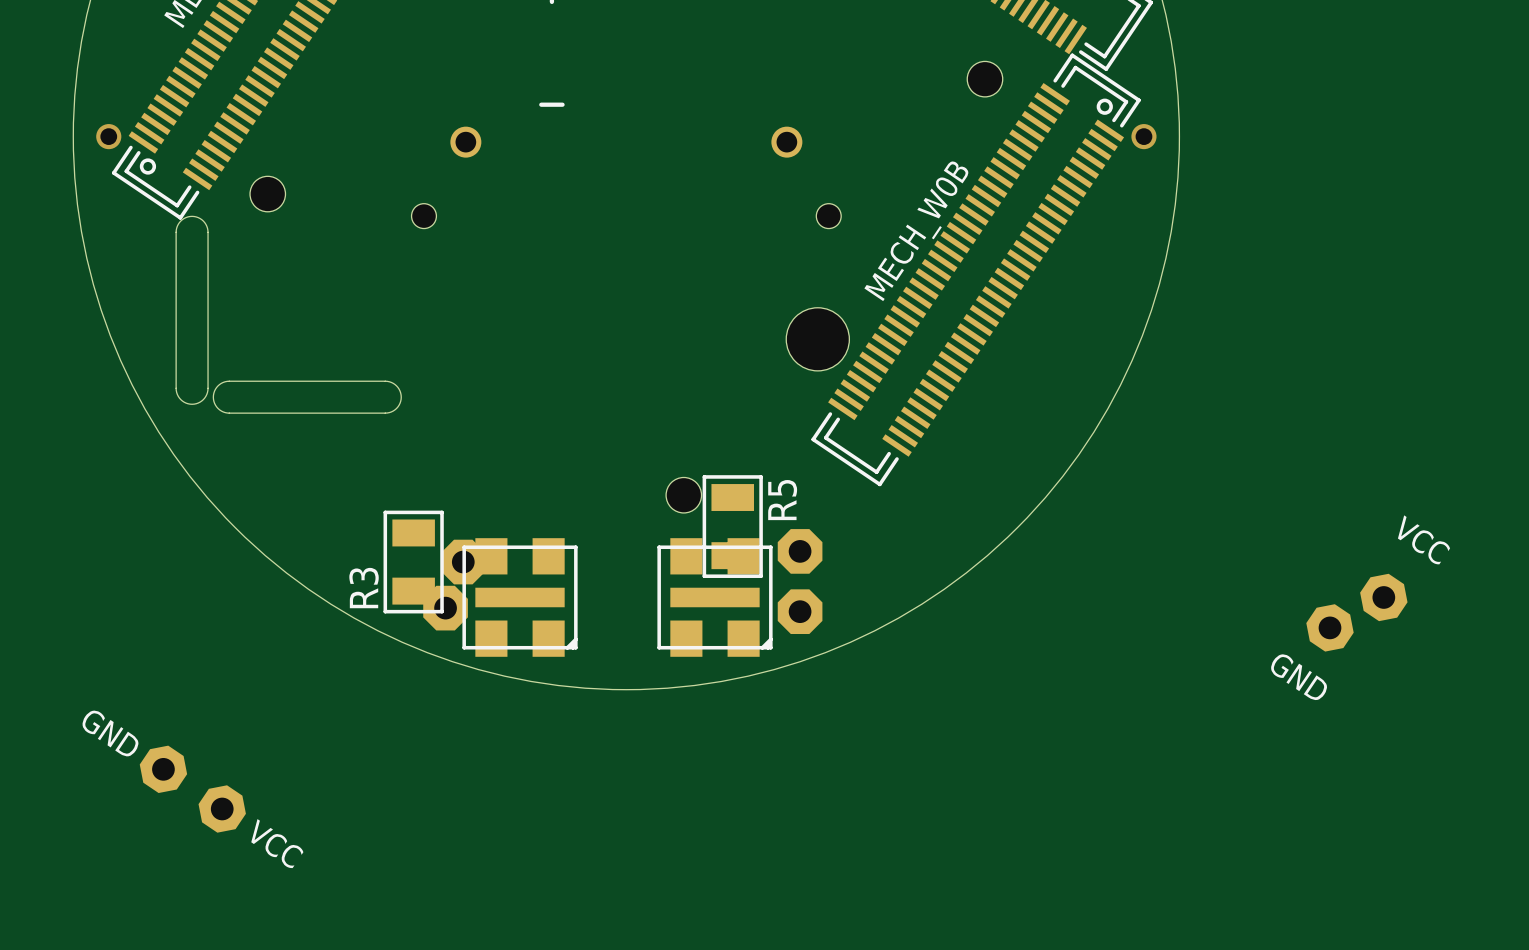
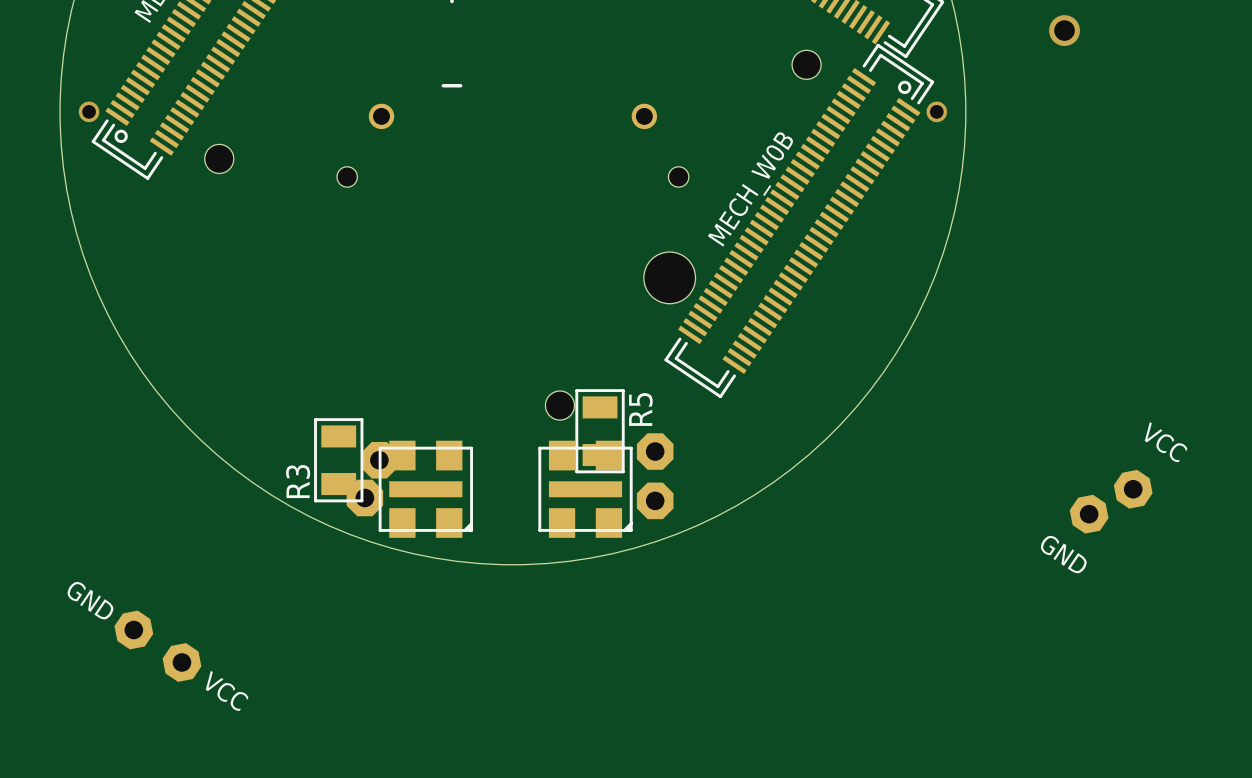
via: none -> (1064, 30)
part: (192, 310) -> none
part: (307, 397) -> none

